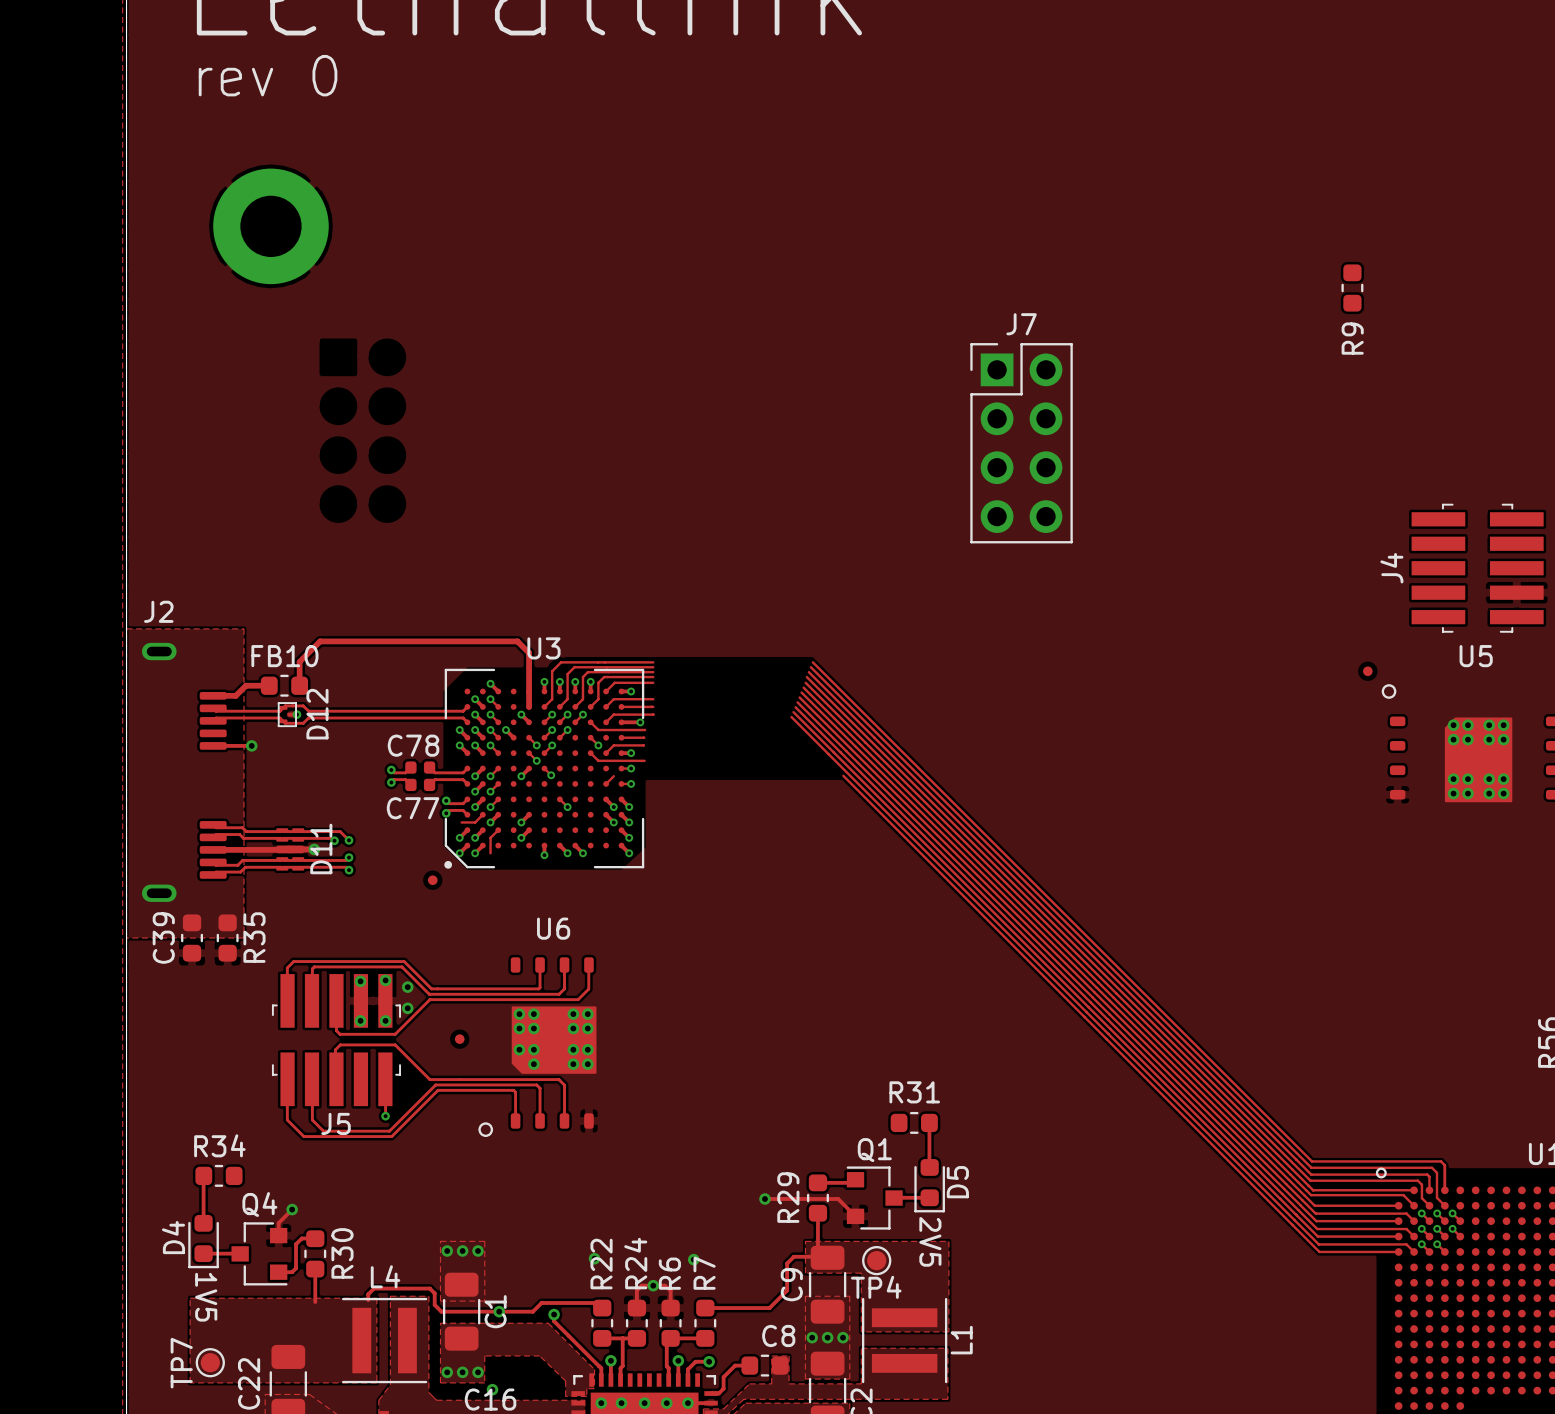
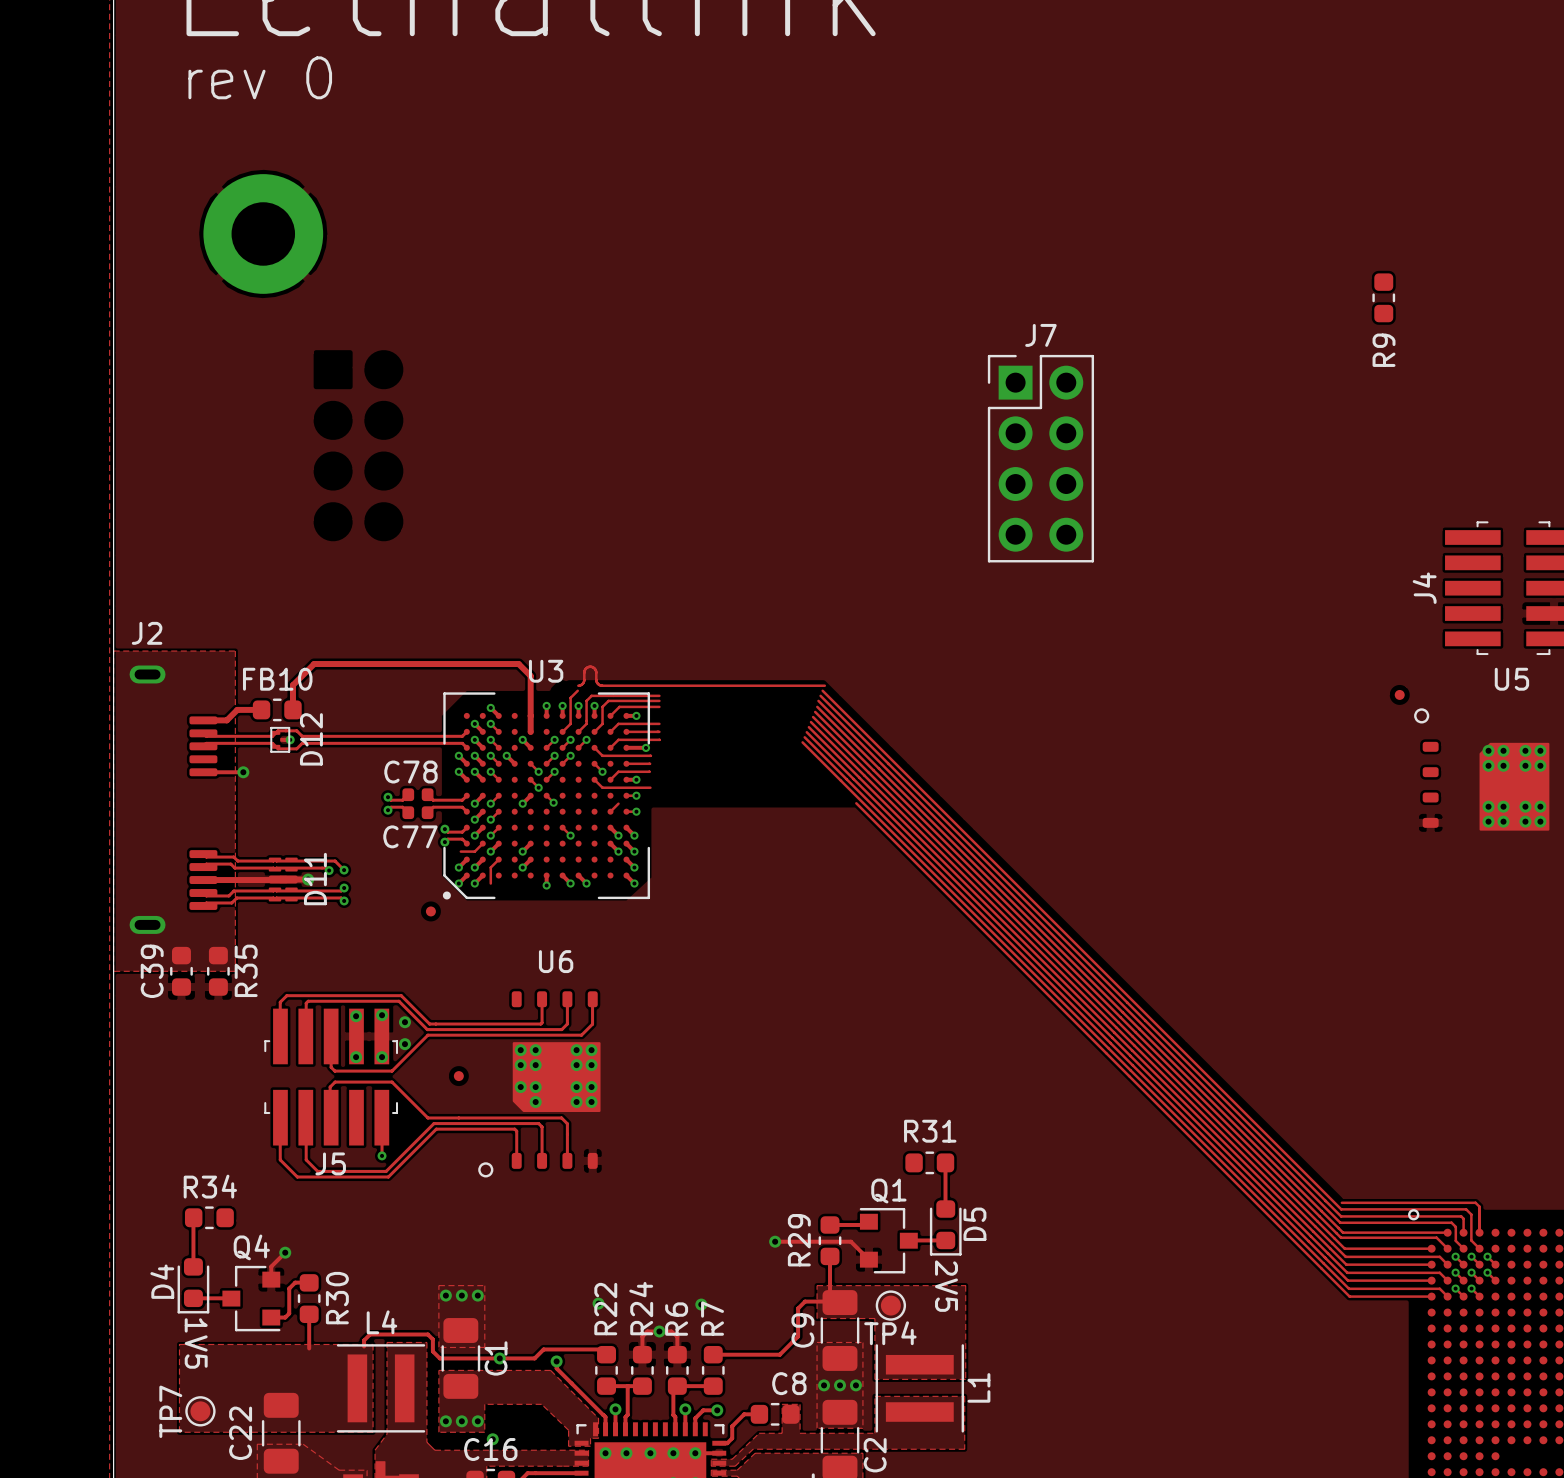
track: (598, 662) (561, 662) (552, 671) (552, 699) (544, 706) -> (602, 685) (597, 683) (595, 670) (590, 666) (585, 668) (583, 682) (578, 685)
track: (812, 662) (1311, 1161) -> (824, 685) (659, 685)
track: (574, 667) (653, 667) -> none

